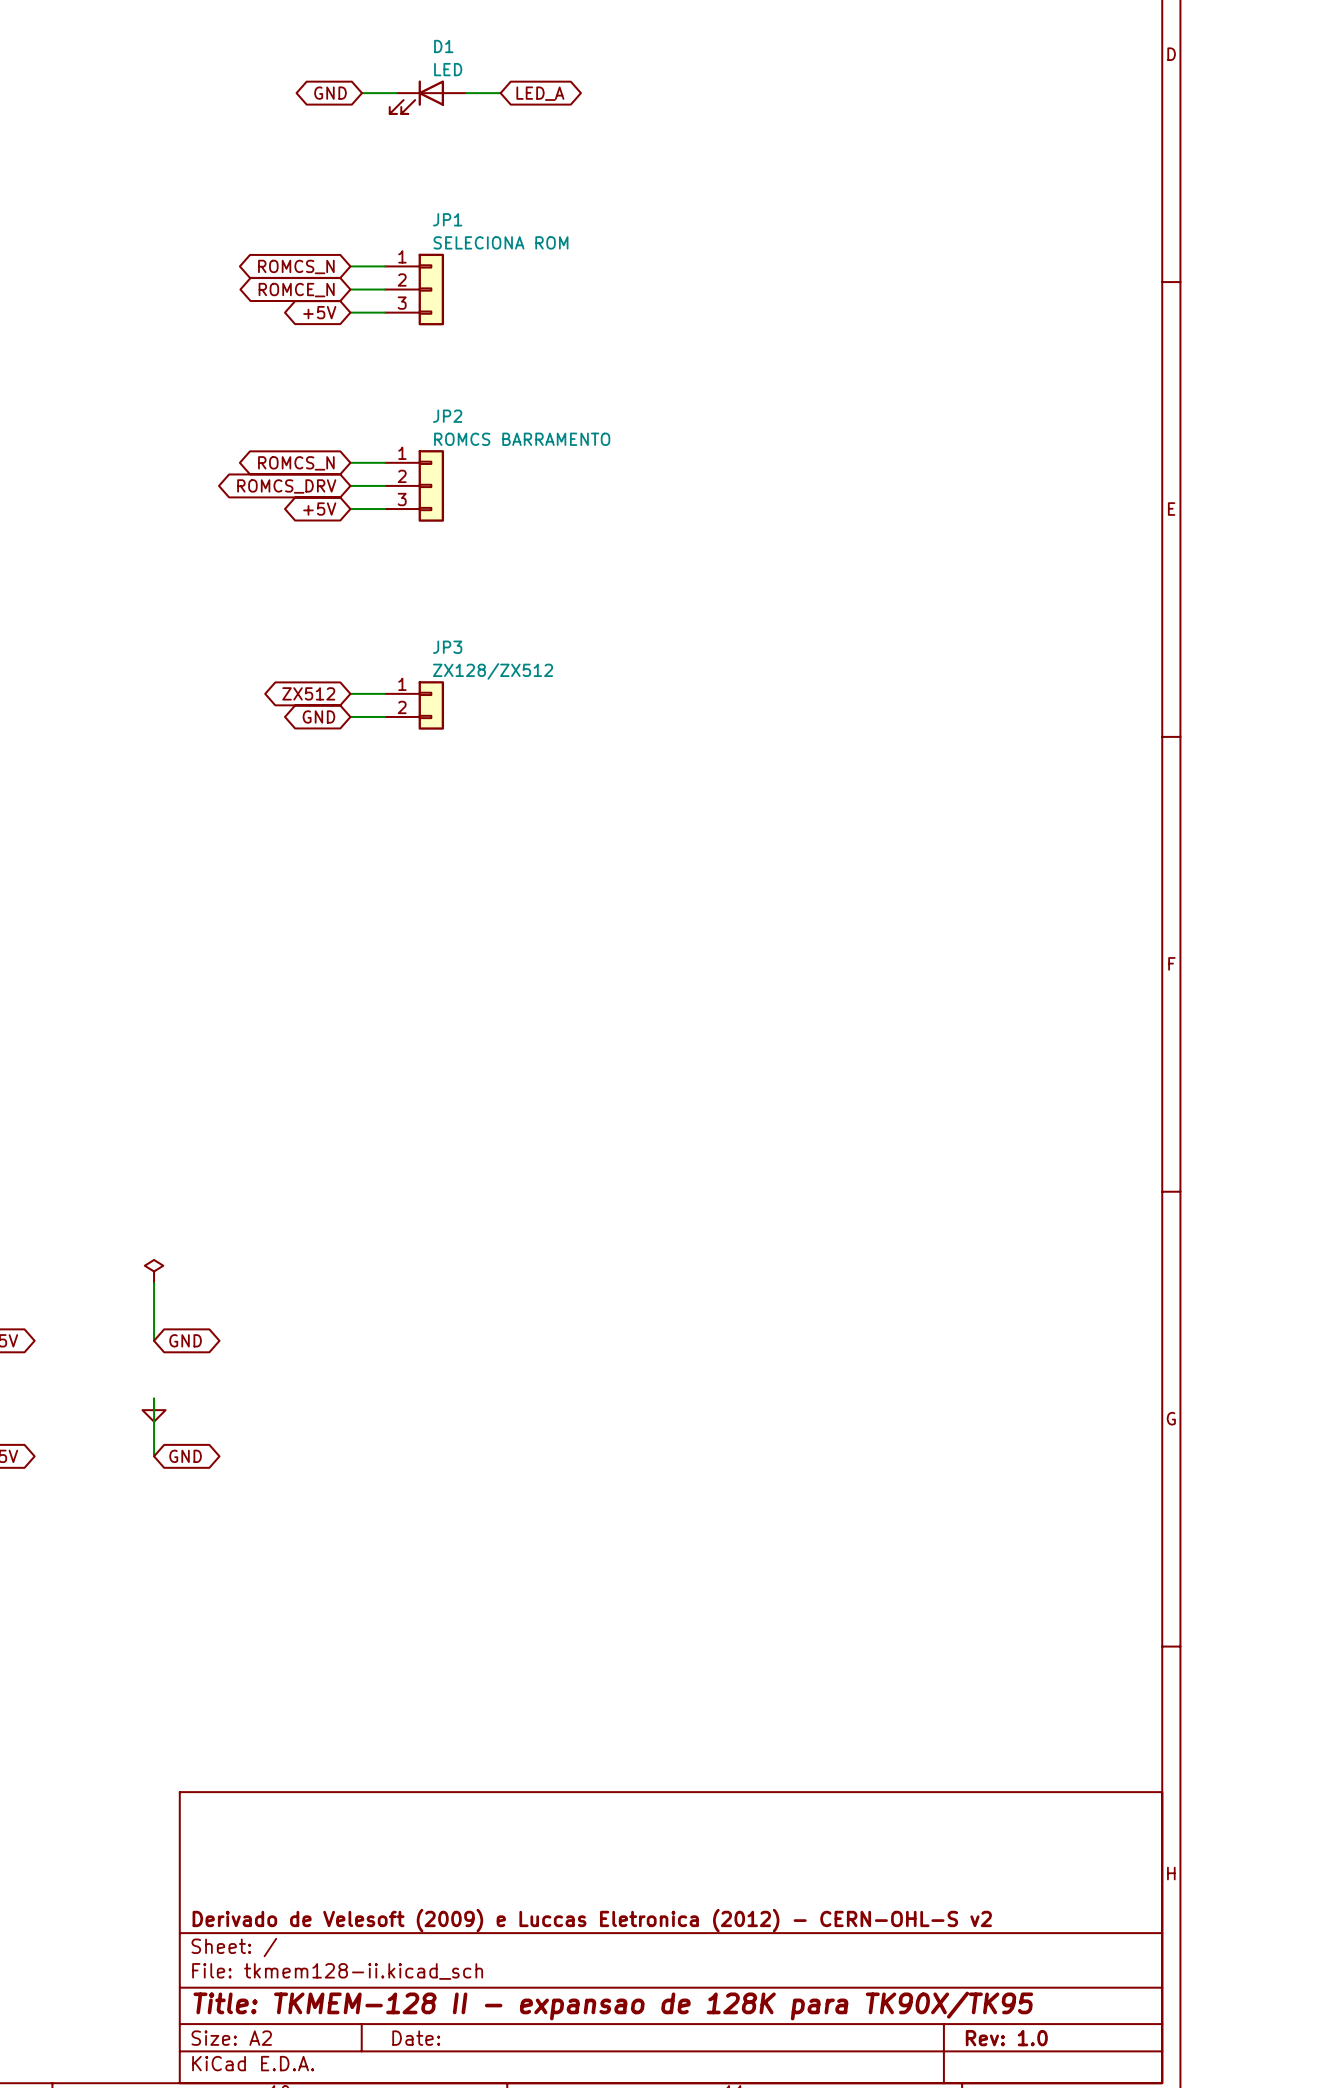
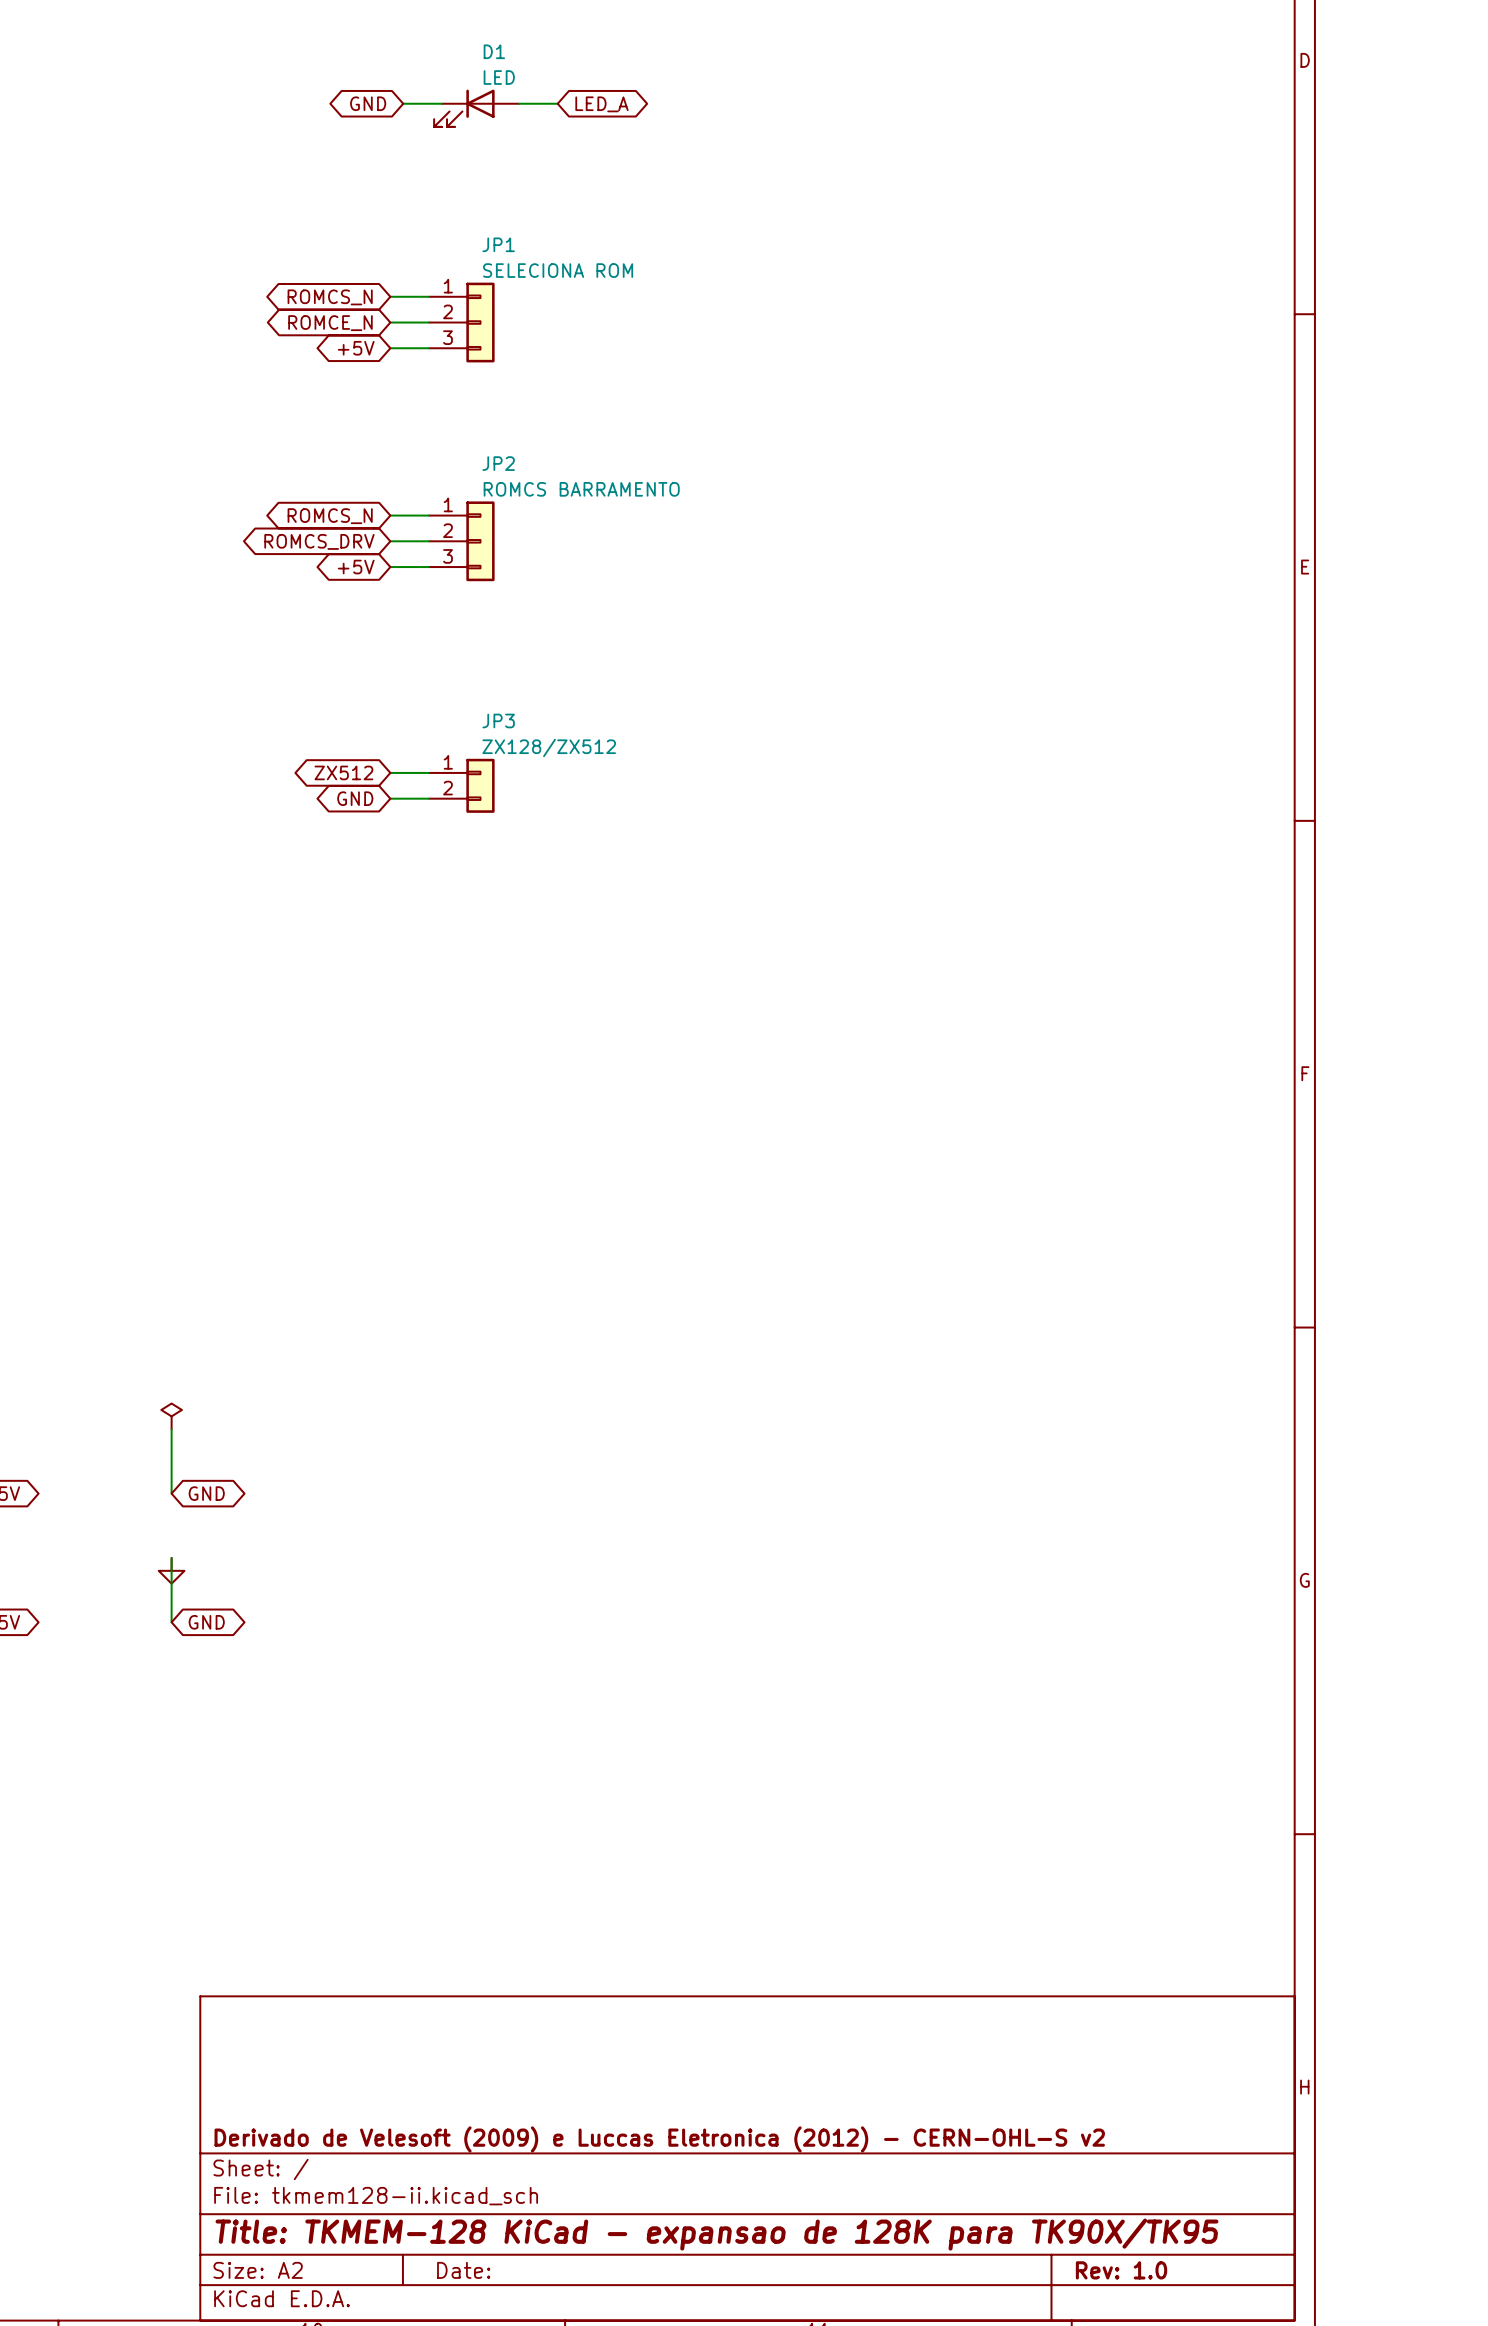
title block: Title: TKMEM-128 II - expansao de 128K para TK90X/TK95 (613, 2005) -> Title: TKMEM-128 KiCad - expansao de 128K para TK90X/TK95 (716, 2234)

